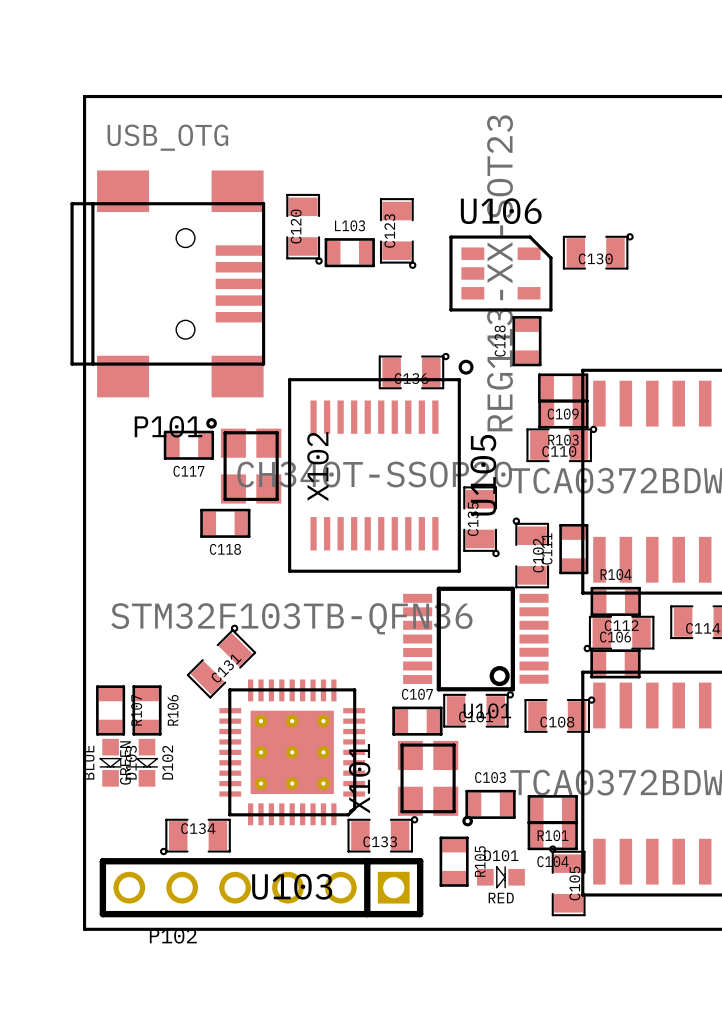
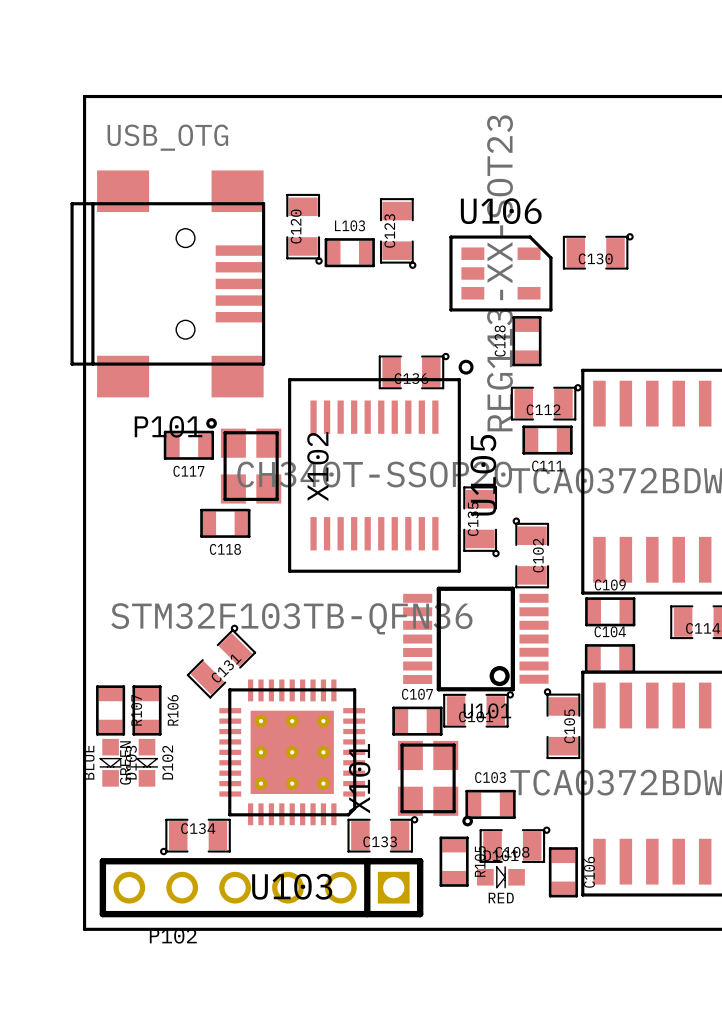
C109 position: (563, 388) -> (610, 611)
C109 name position: C109 (563, 414) -> C109 (610, 584)
R103: (563, 414) -> none
C110: (561, 443) -> none
C111 rotation: 0° (573, 549) -> 90° clockwise (547, 440)
C111 position: (573, 549) -> (547, 440)
R104: (615, 601) -> none
C112 rotation: 0° (619, 633) -> 180° (546, 402)
C112 position: (619, 633) -> (546, 402)
C106 rotation: 0° (615, 663) -> 90° clockwise (563, 872)
C106 position: (615, 663) -> (563, 872)
C108 position: (559, 714) -> (515, 844)
R101: (552, 809) -> none
C104 position: (552, 835) -> (610, 658)
C104 name position: C104 (552, 861) -> C104 (610, 631)
C105 position: (567, 880) -> (562, 723)

